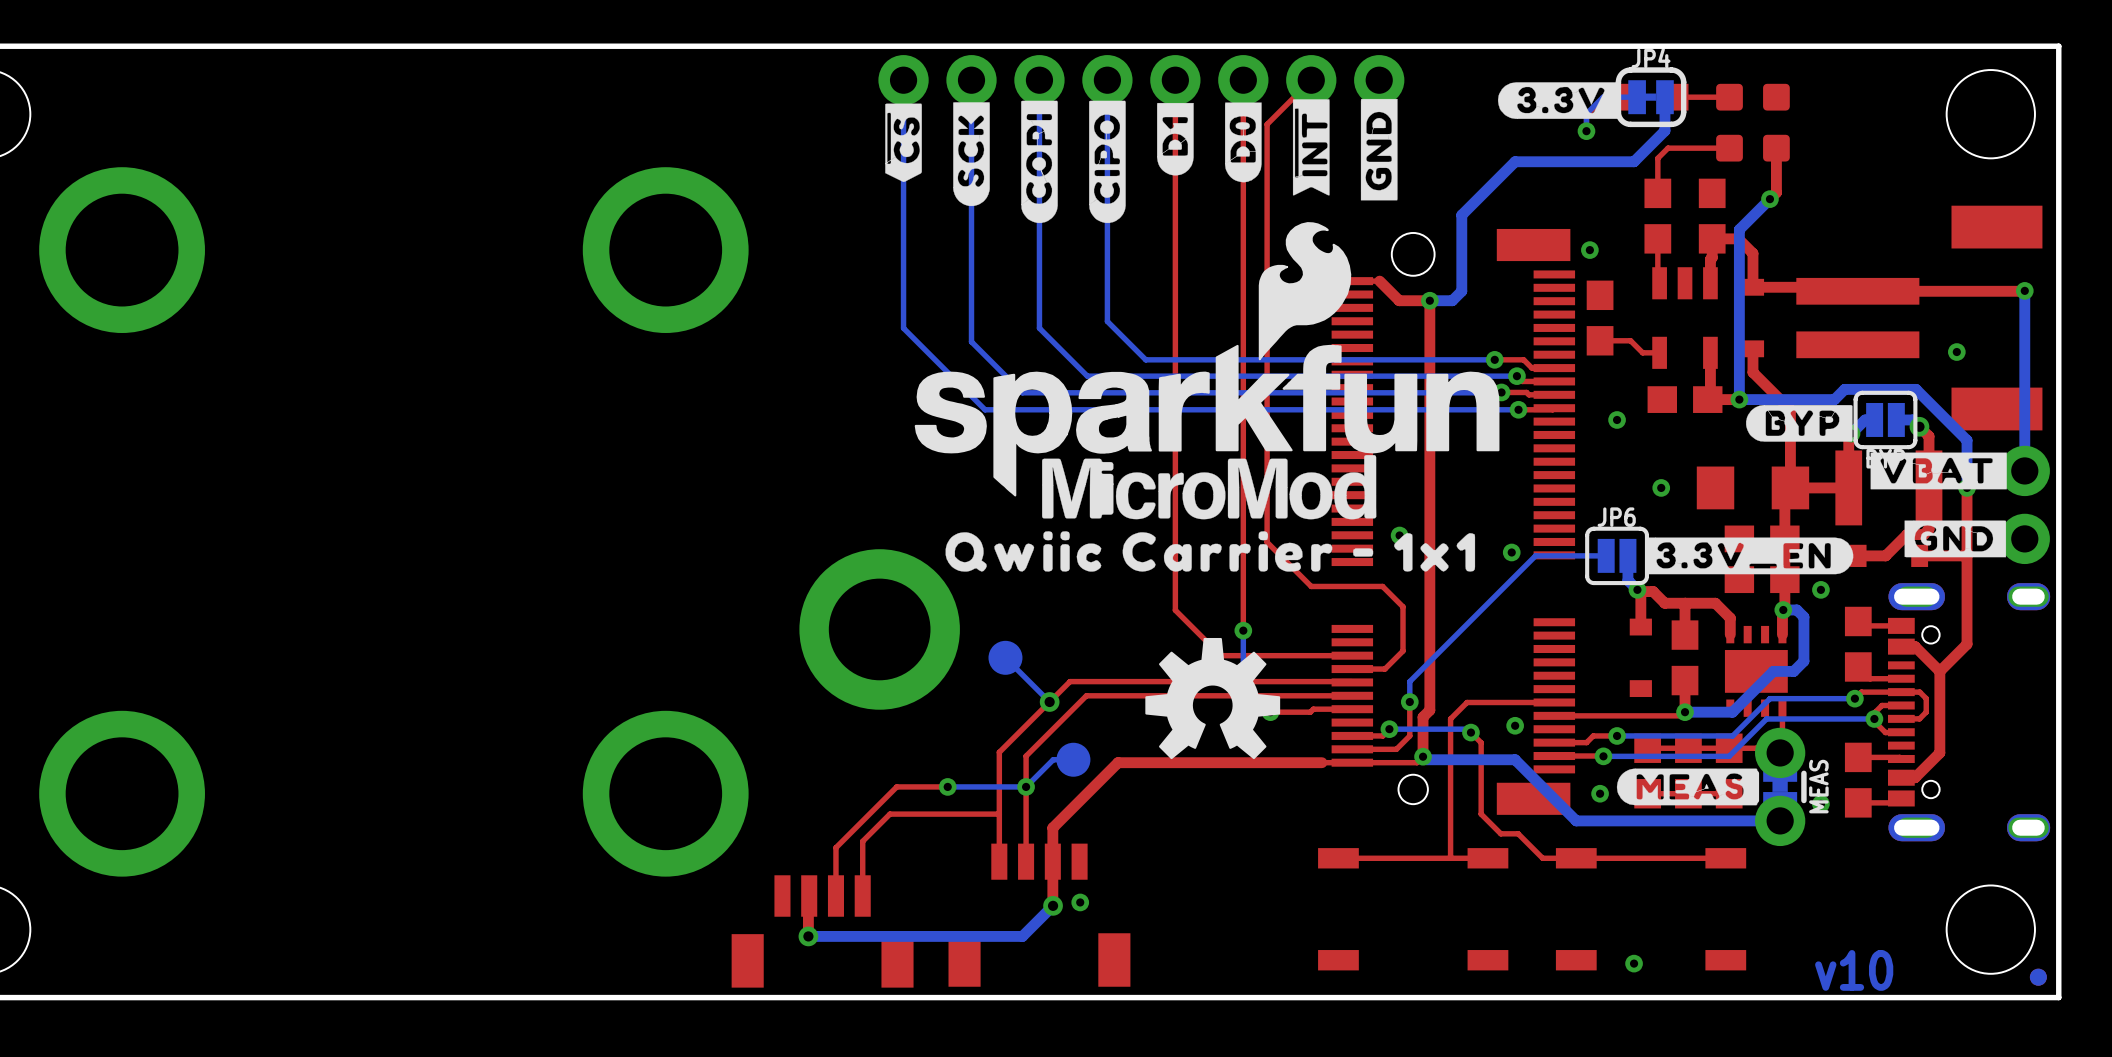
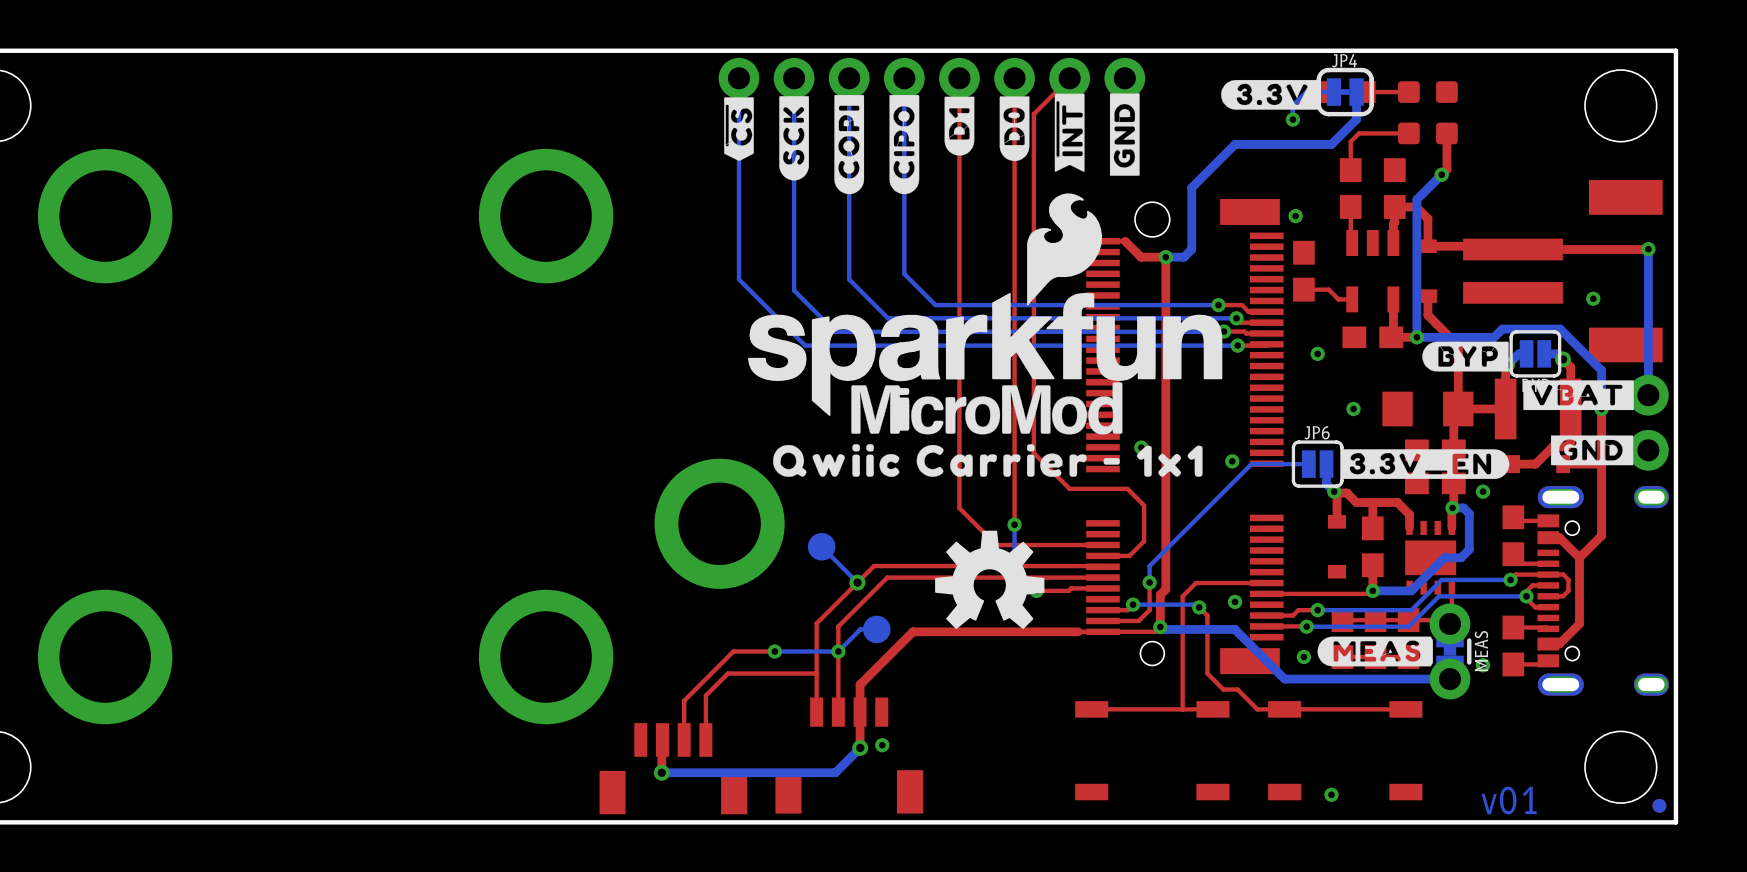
text: v10 (1854, 970) -> v01 (1509, 800)

